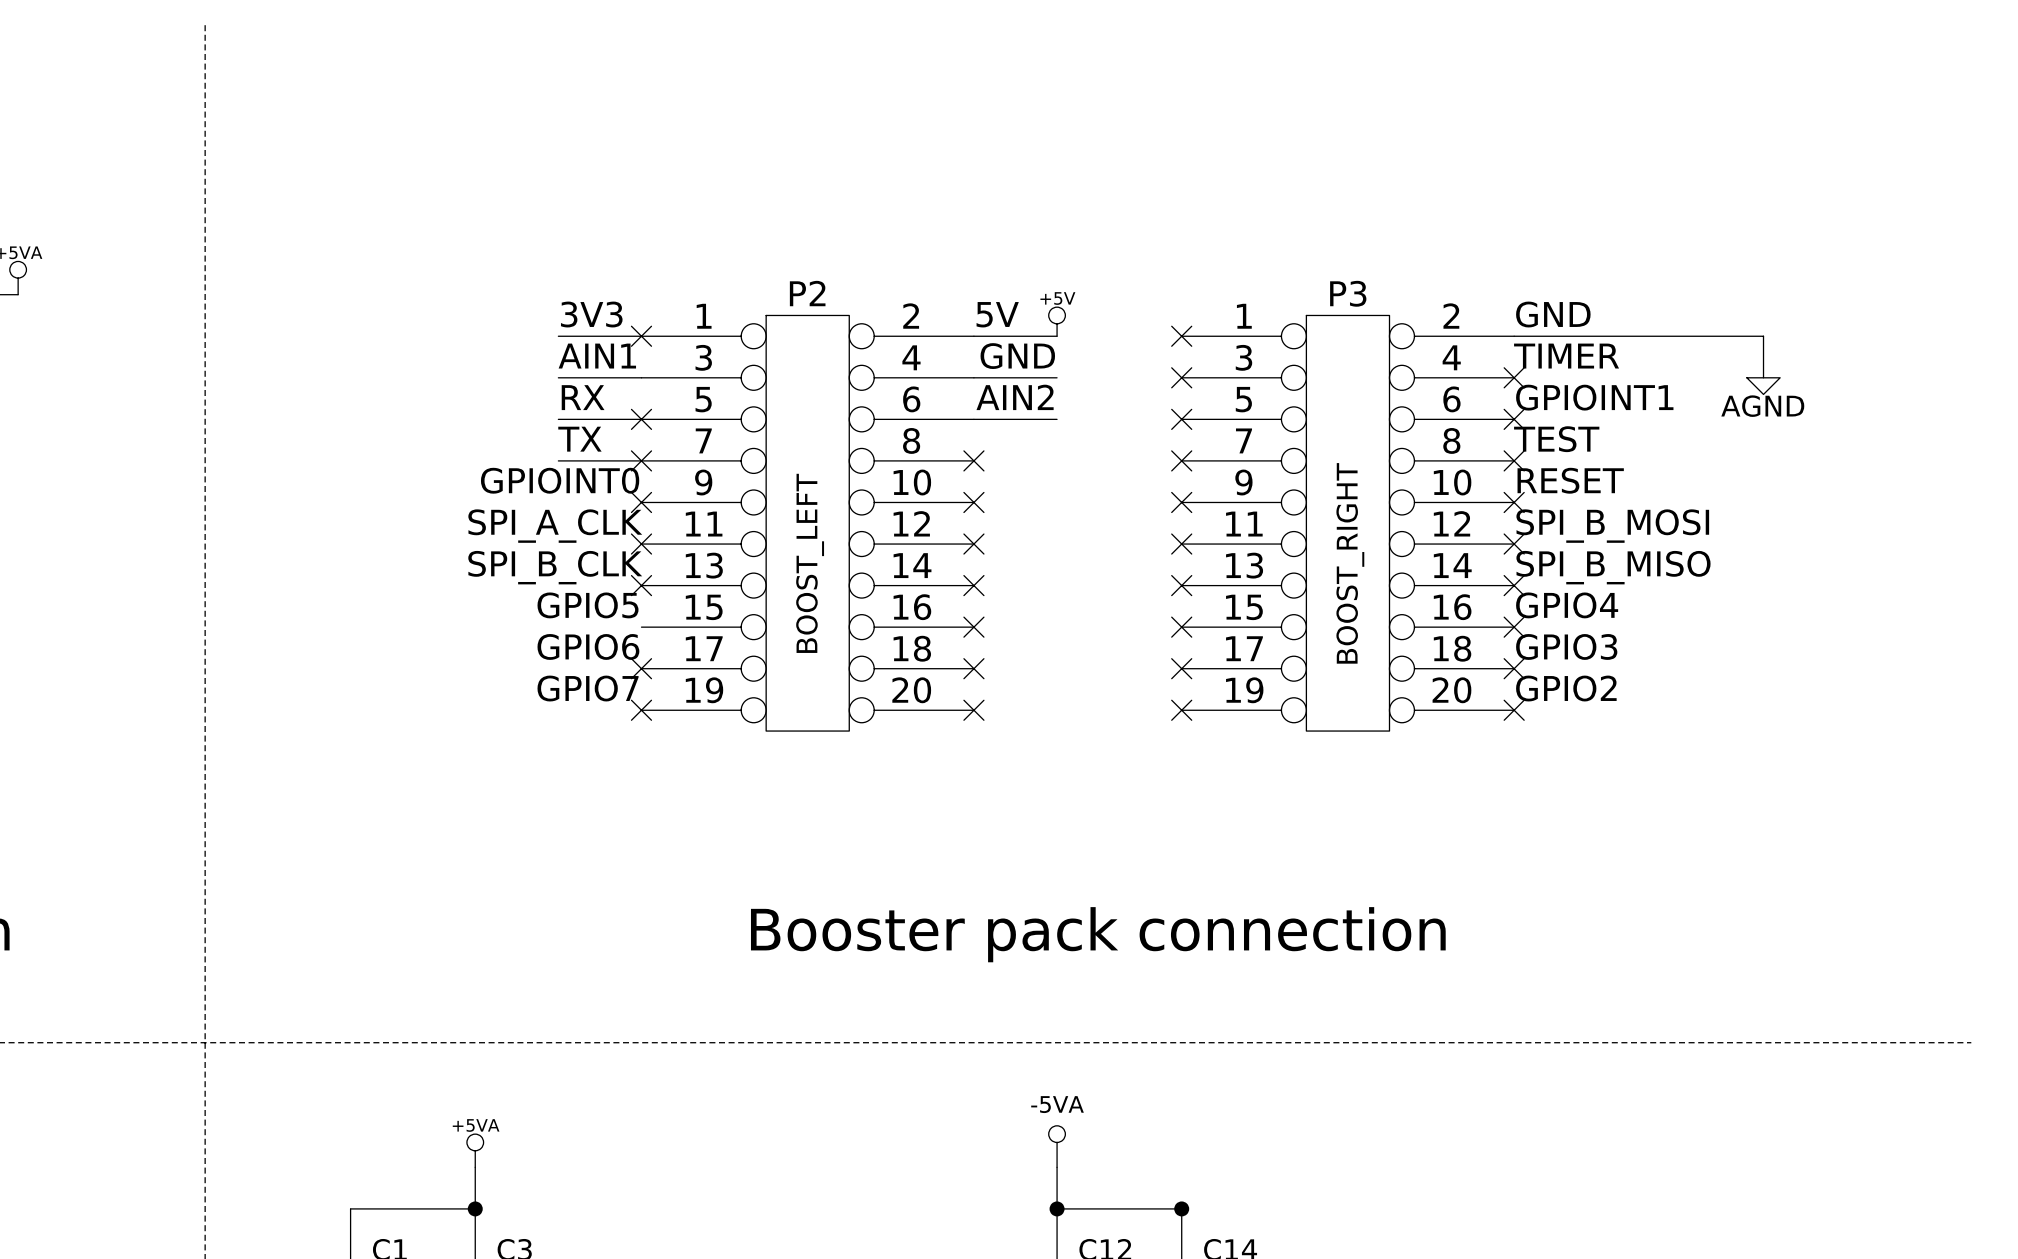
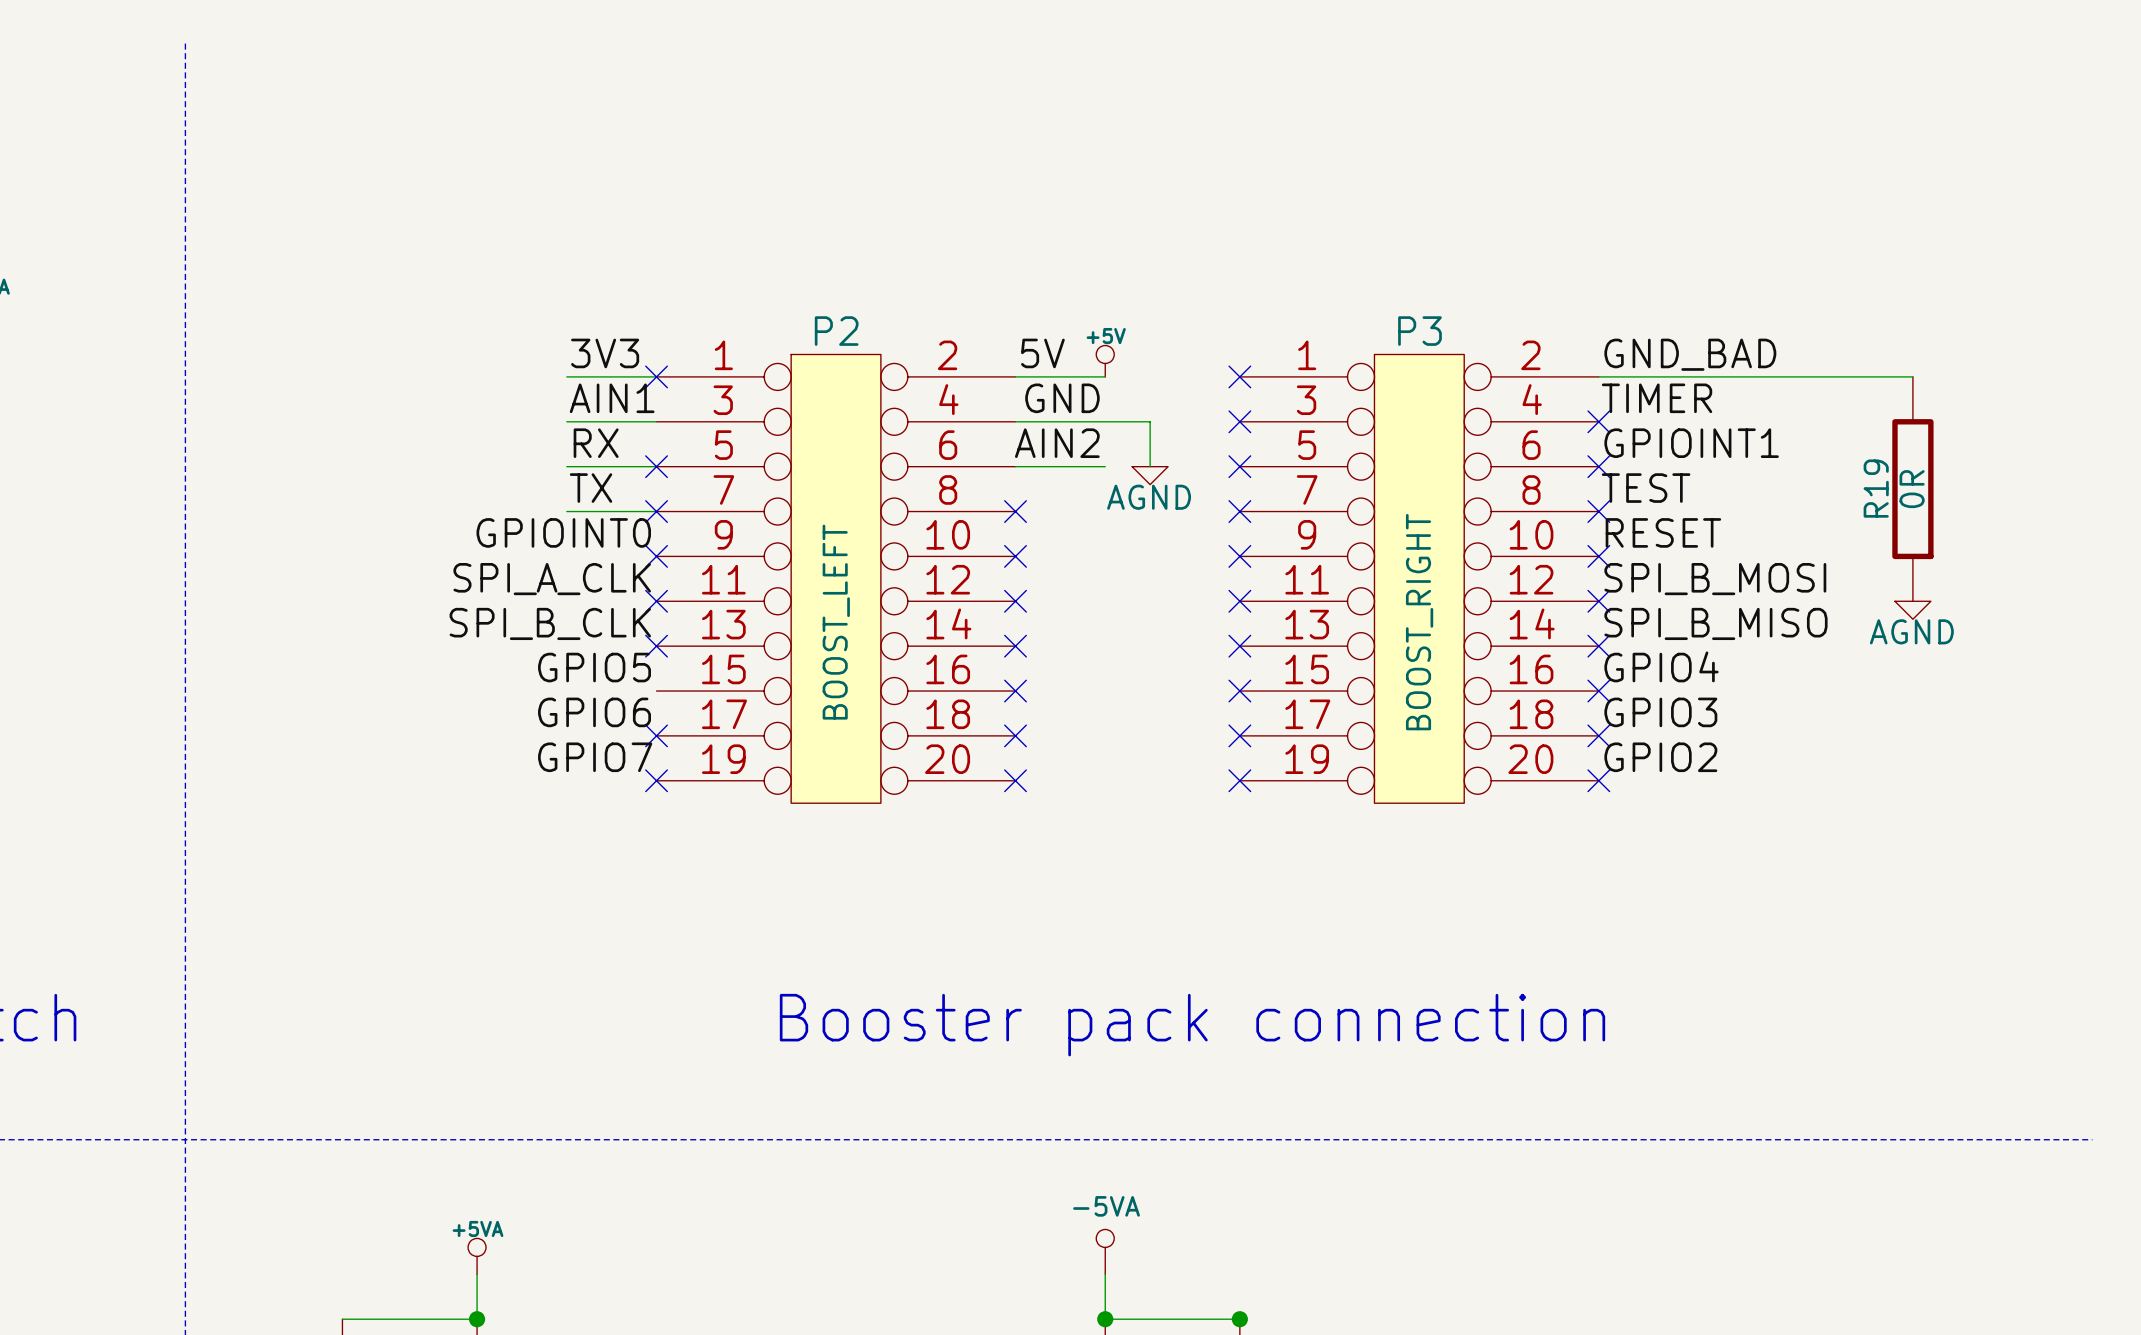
label: GND (1553, 314) -> GND_BAD (1690, 354)
wire: (1763, 336) (1763, 377) -> (1868, 376) (1912, 376)
wire: none -> (1105, 421) (1150, 421) (1150, 466)
power symbol position: AGND (1763, 386) -> AGND (1912, 610)
power symbol: none -> AGND (1150, 475)
R19: none -> 0R (1912, 489)

